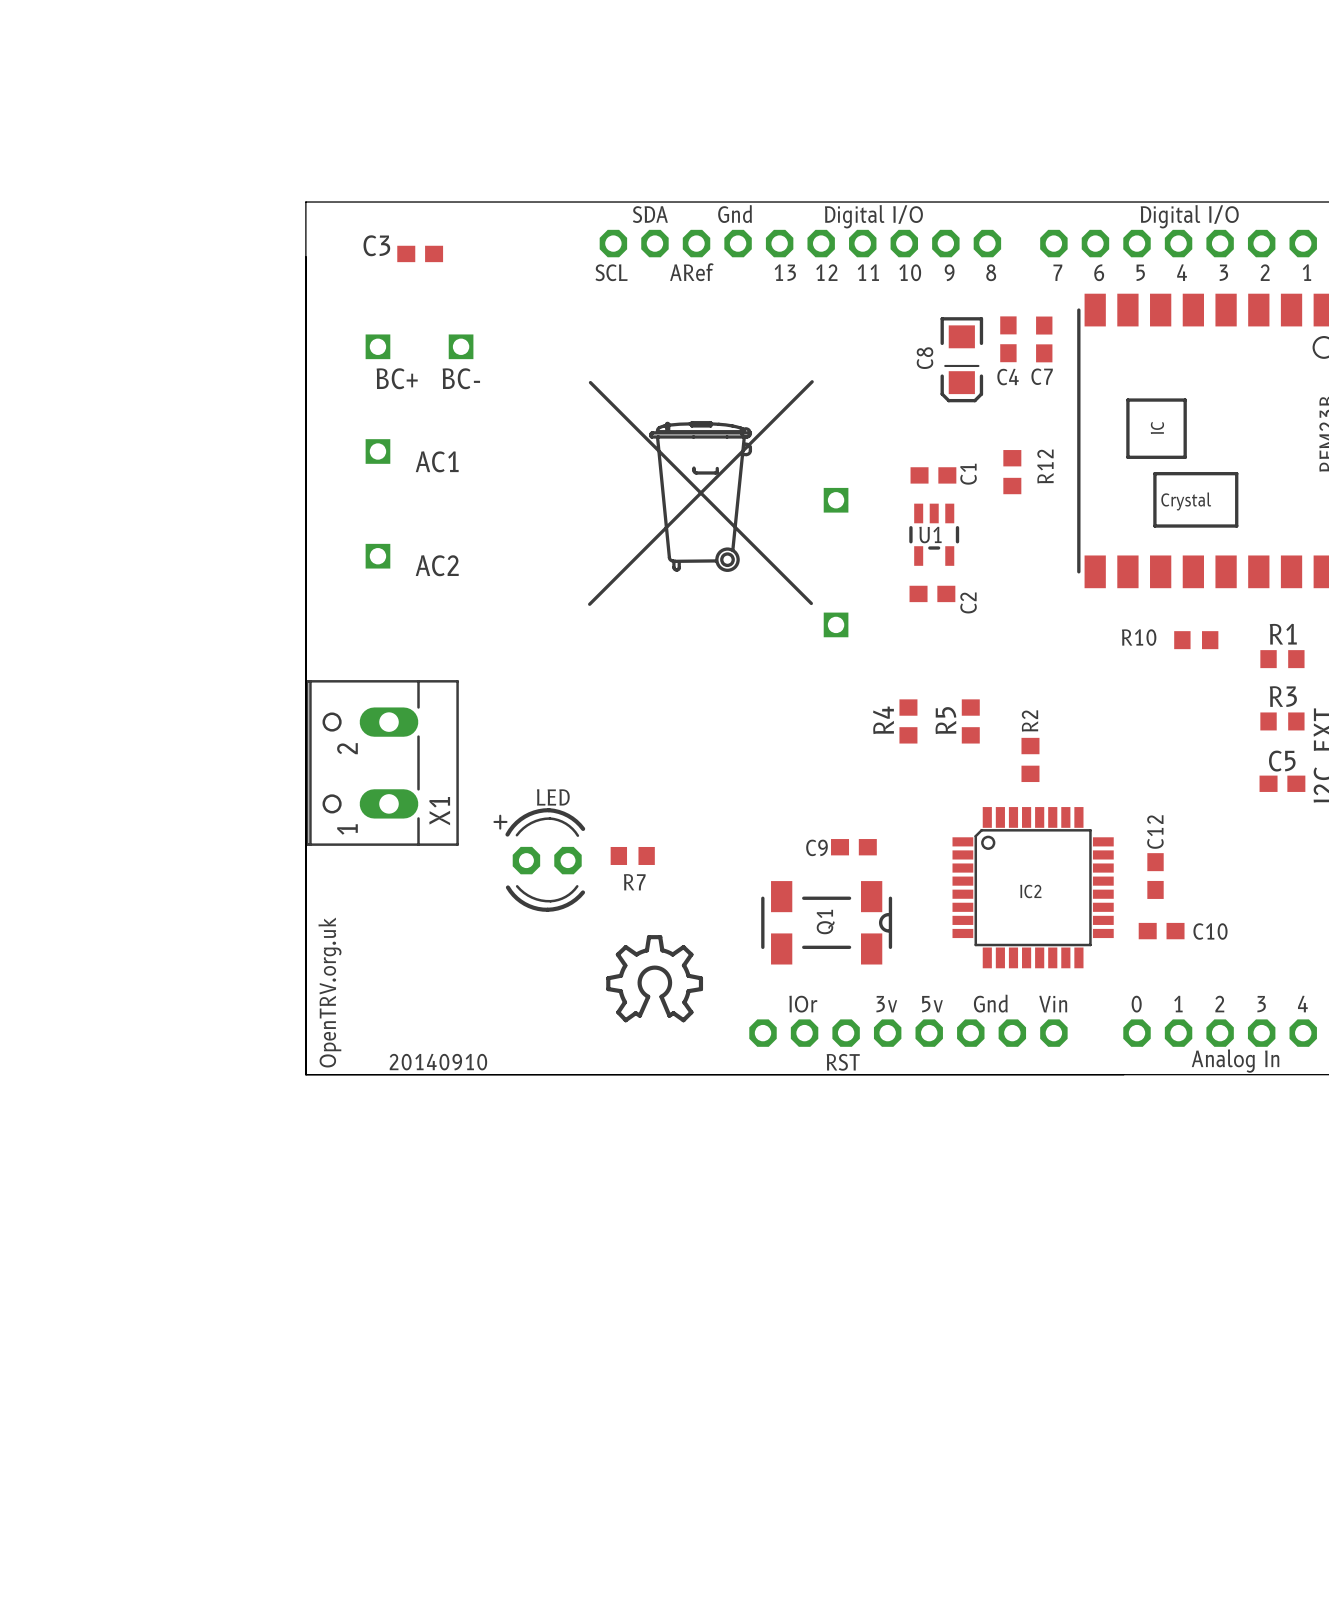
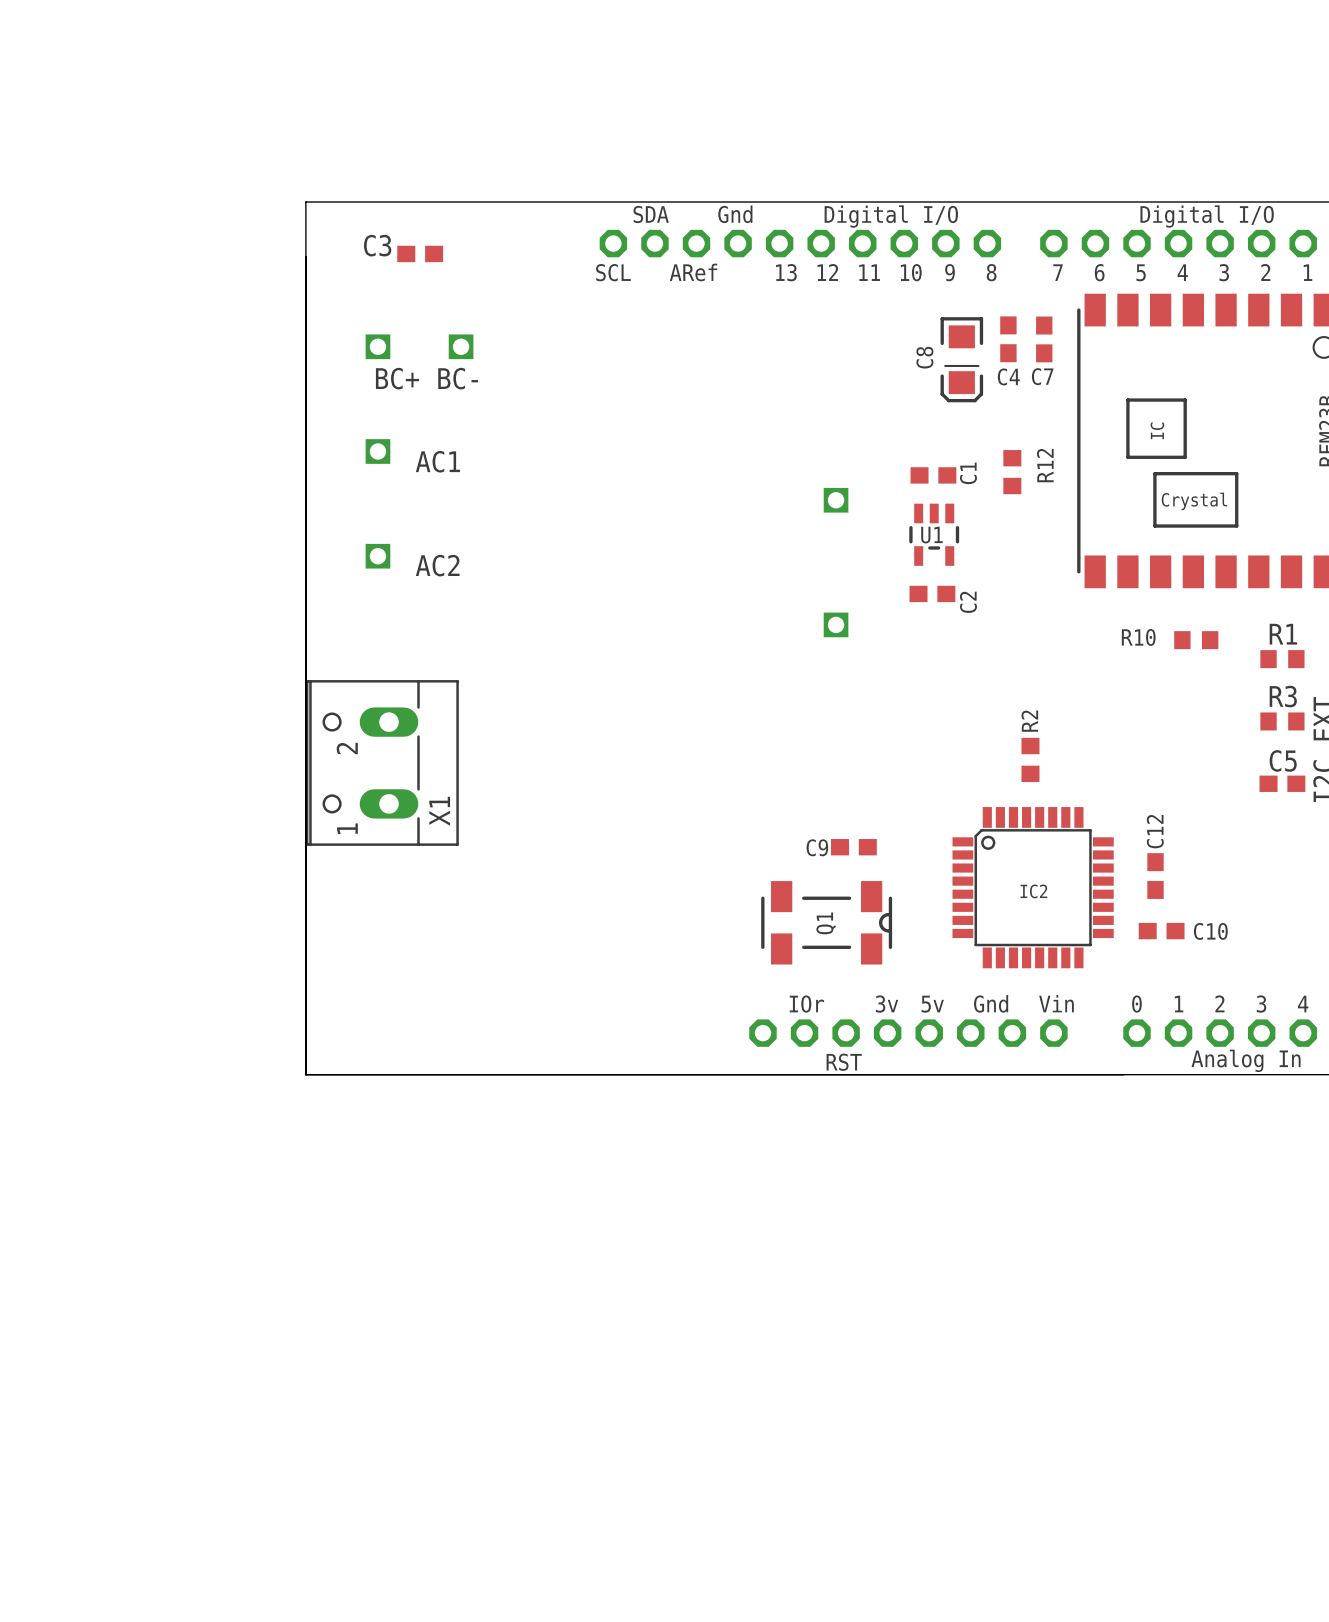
drawing: [588, 380, 814, 606] -> none
R4: (908, 721) -> none
R5: (970, 721) -> none
R7: (632, 855) -> none
LED: (539, 859) -> none
drawing: [606, 935, 704, 1023] -> none
text: OpenTRV.org.uk (329, 992) -> none
text: 20140910 (438, 1062) -> none

